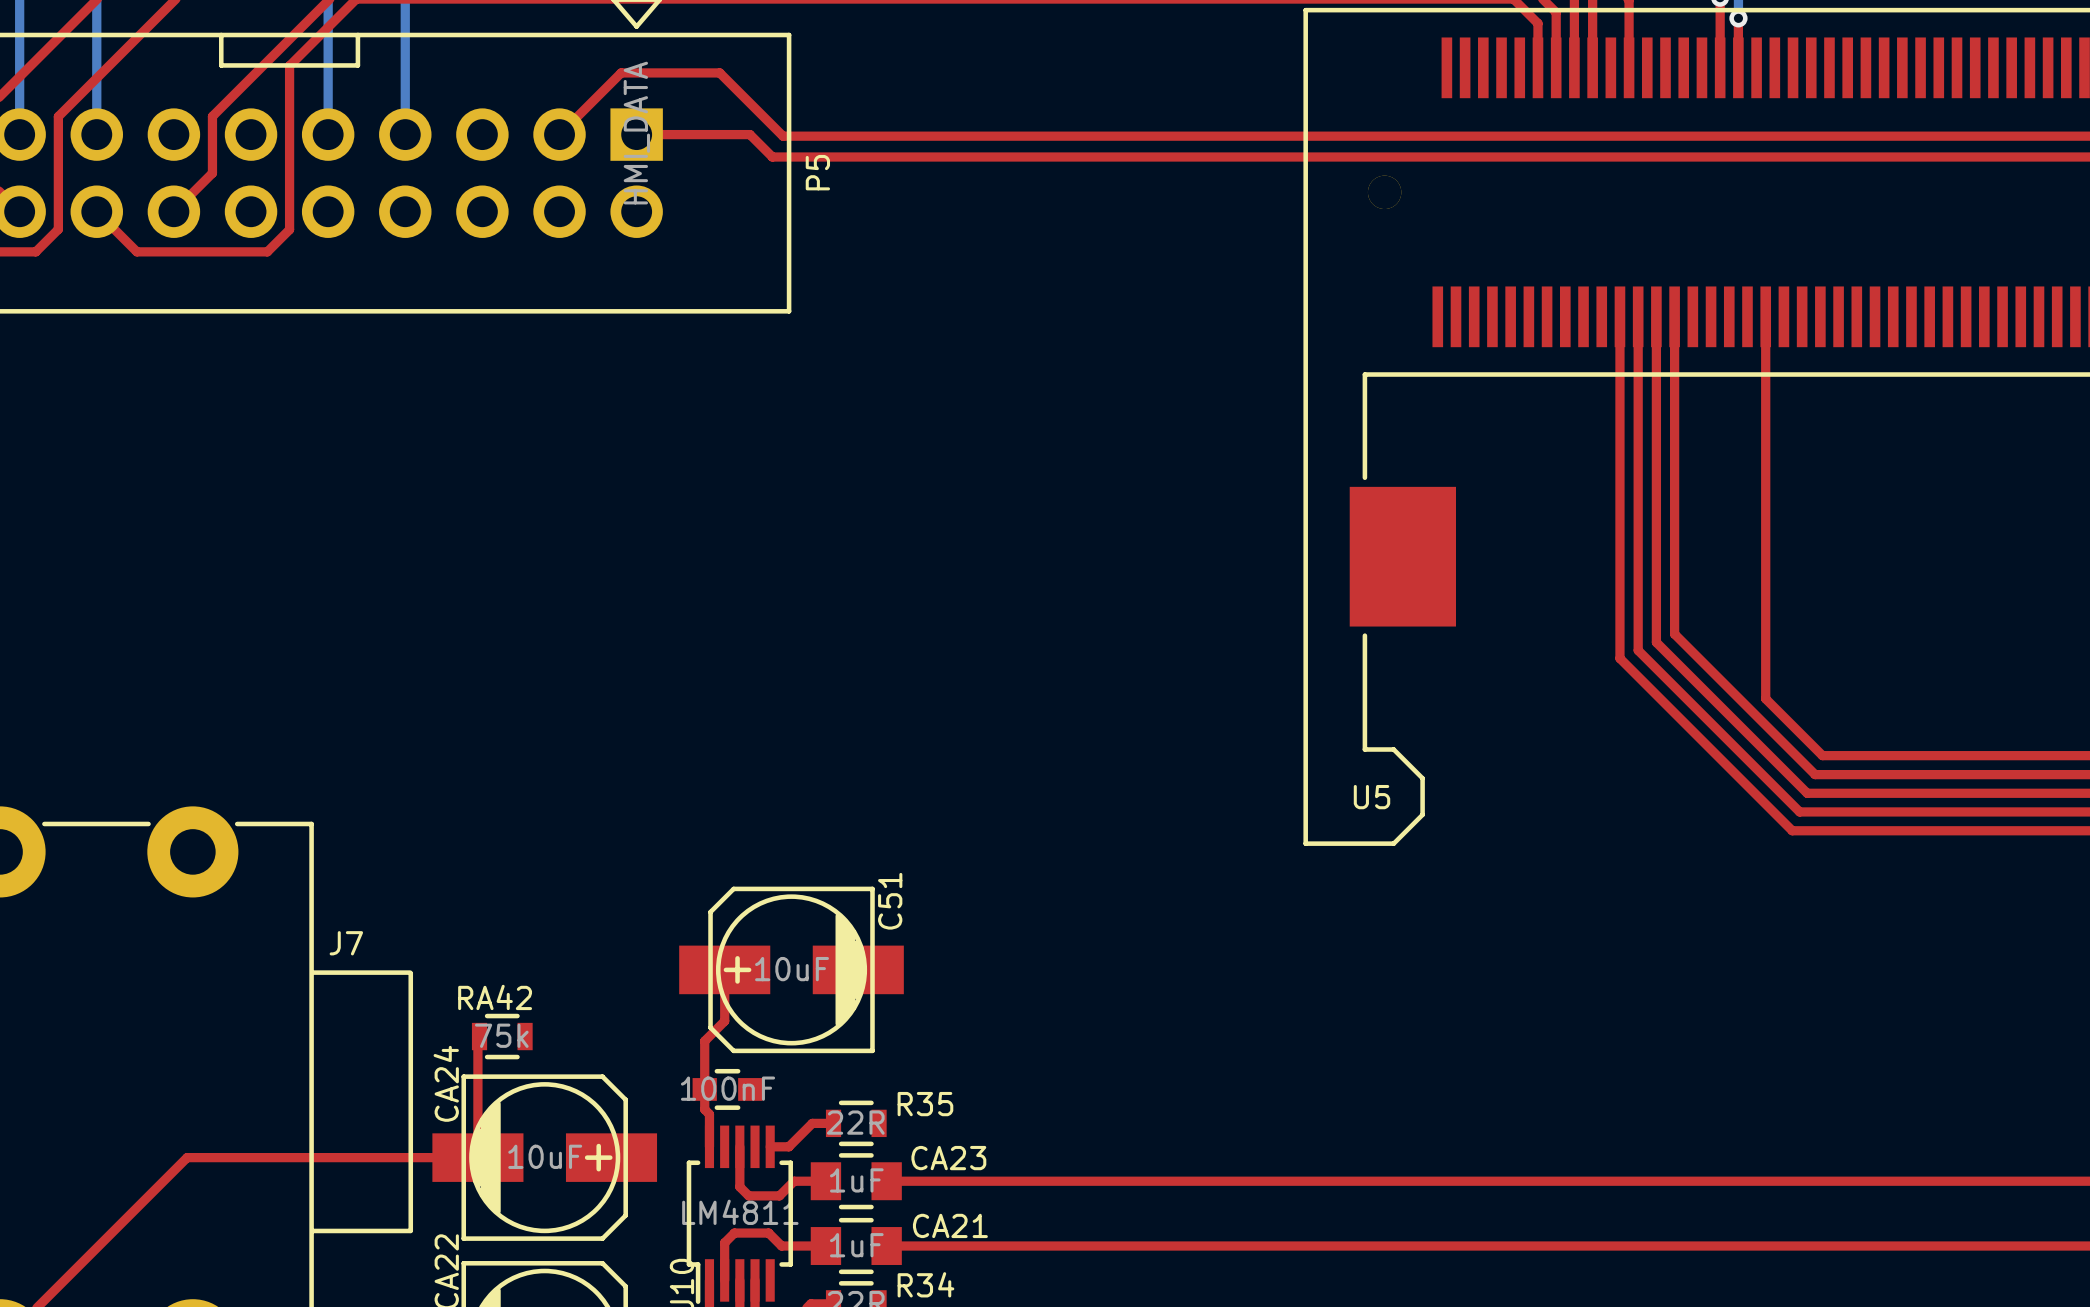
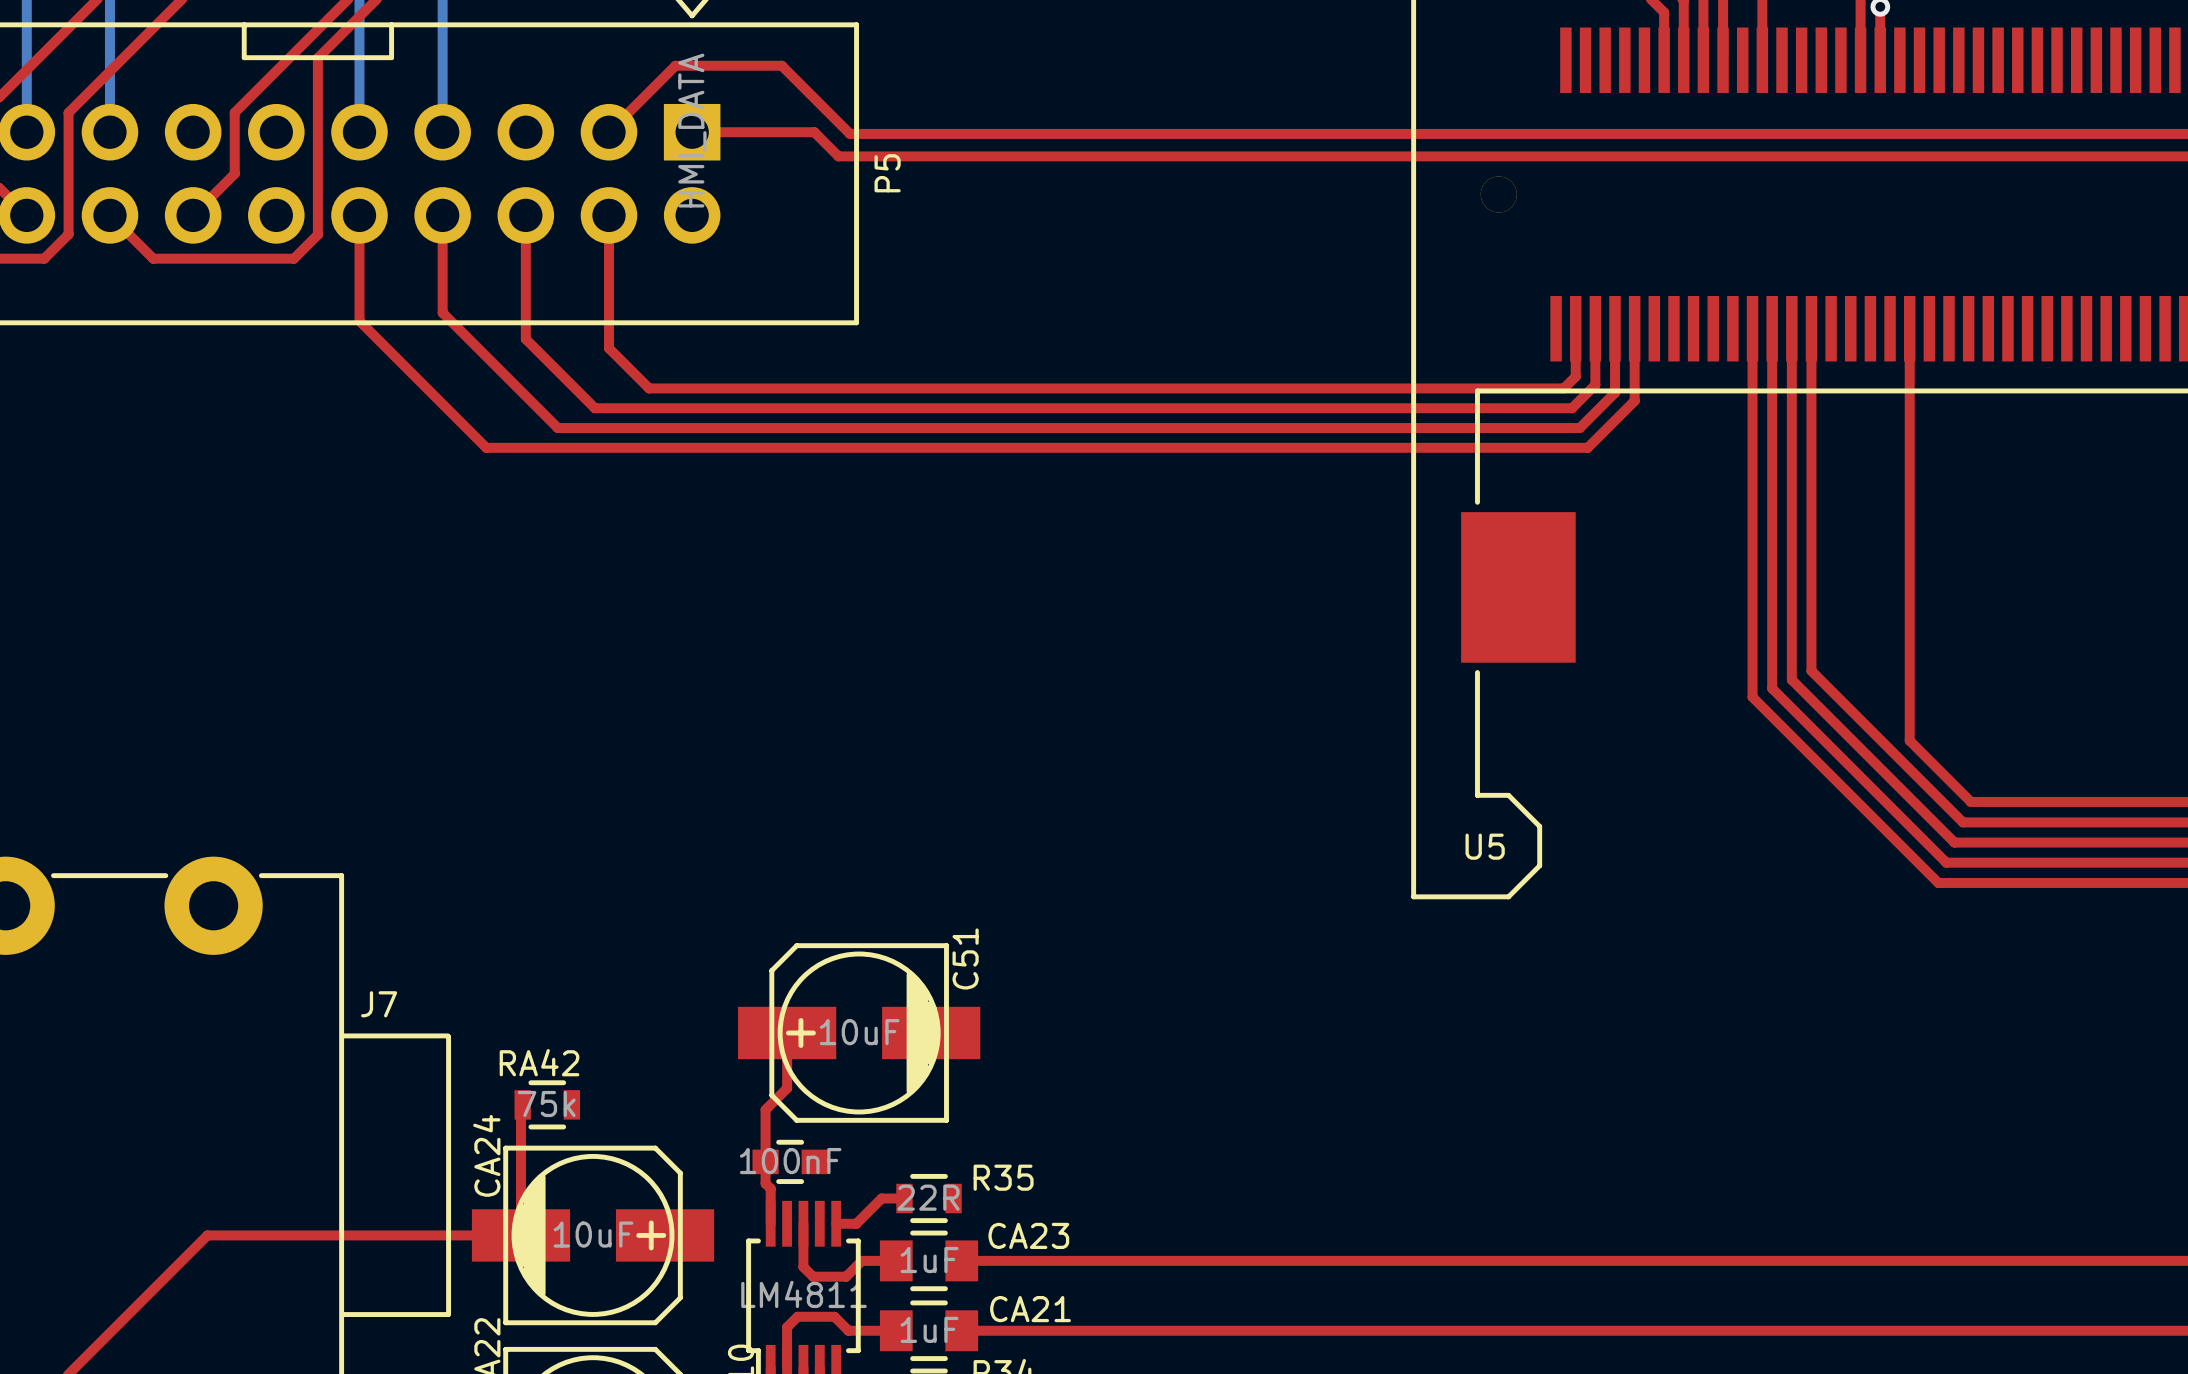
top track: none -> (359, 215) (359, 320) (486, 447) (1587, 447) (1634, 400) (1634, 328)
top track: none -> (442, 215) (442, 312) (557, 428) (1579, 428) (1615, 392) (1615, 328)
top track: none -> (525, 215) (525, 339) (594, 408) (1572, 408) (1595, 384) (1595, 328)
top track: none -> (609, 215) (609, 348) (649, 388) (1563, 388) (1575, 376) (1575, 328)

